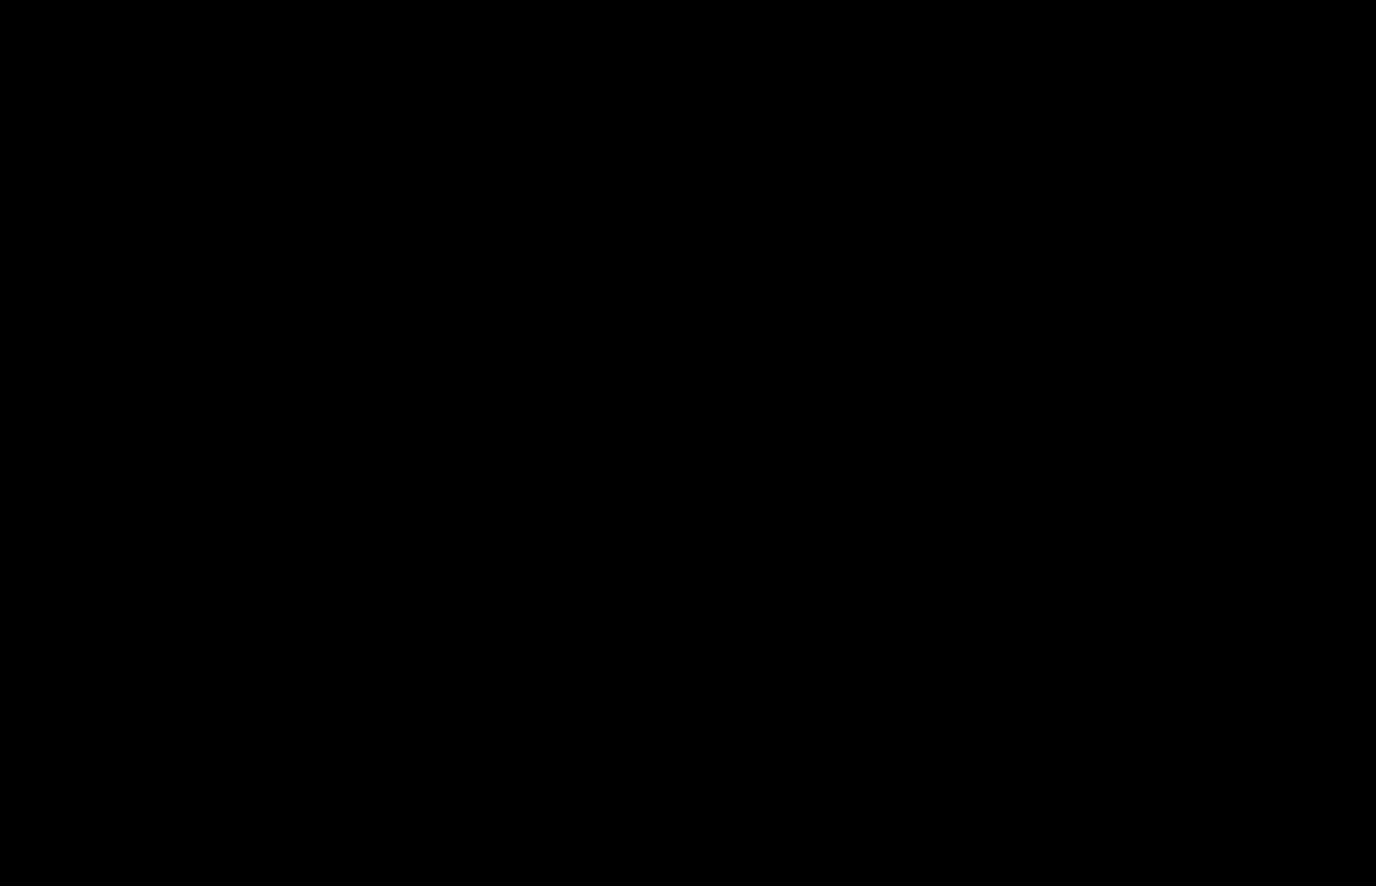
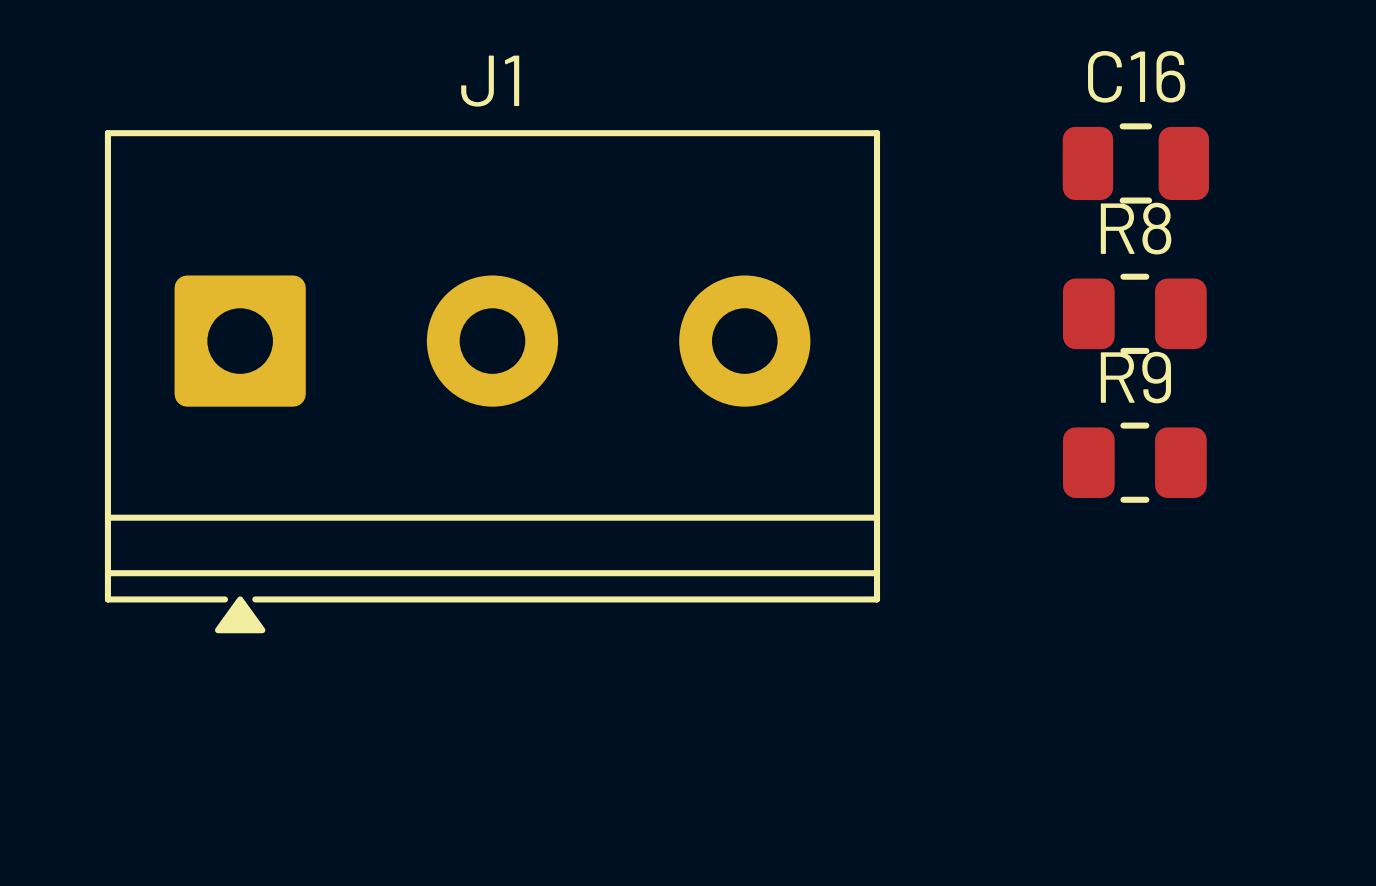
C16: none -> (1135, 163)
R8: none -> (1134, 313)
J1: none -> (492, 381)
R9: none -> (1134, 462)

